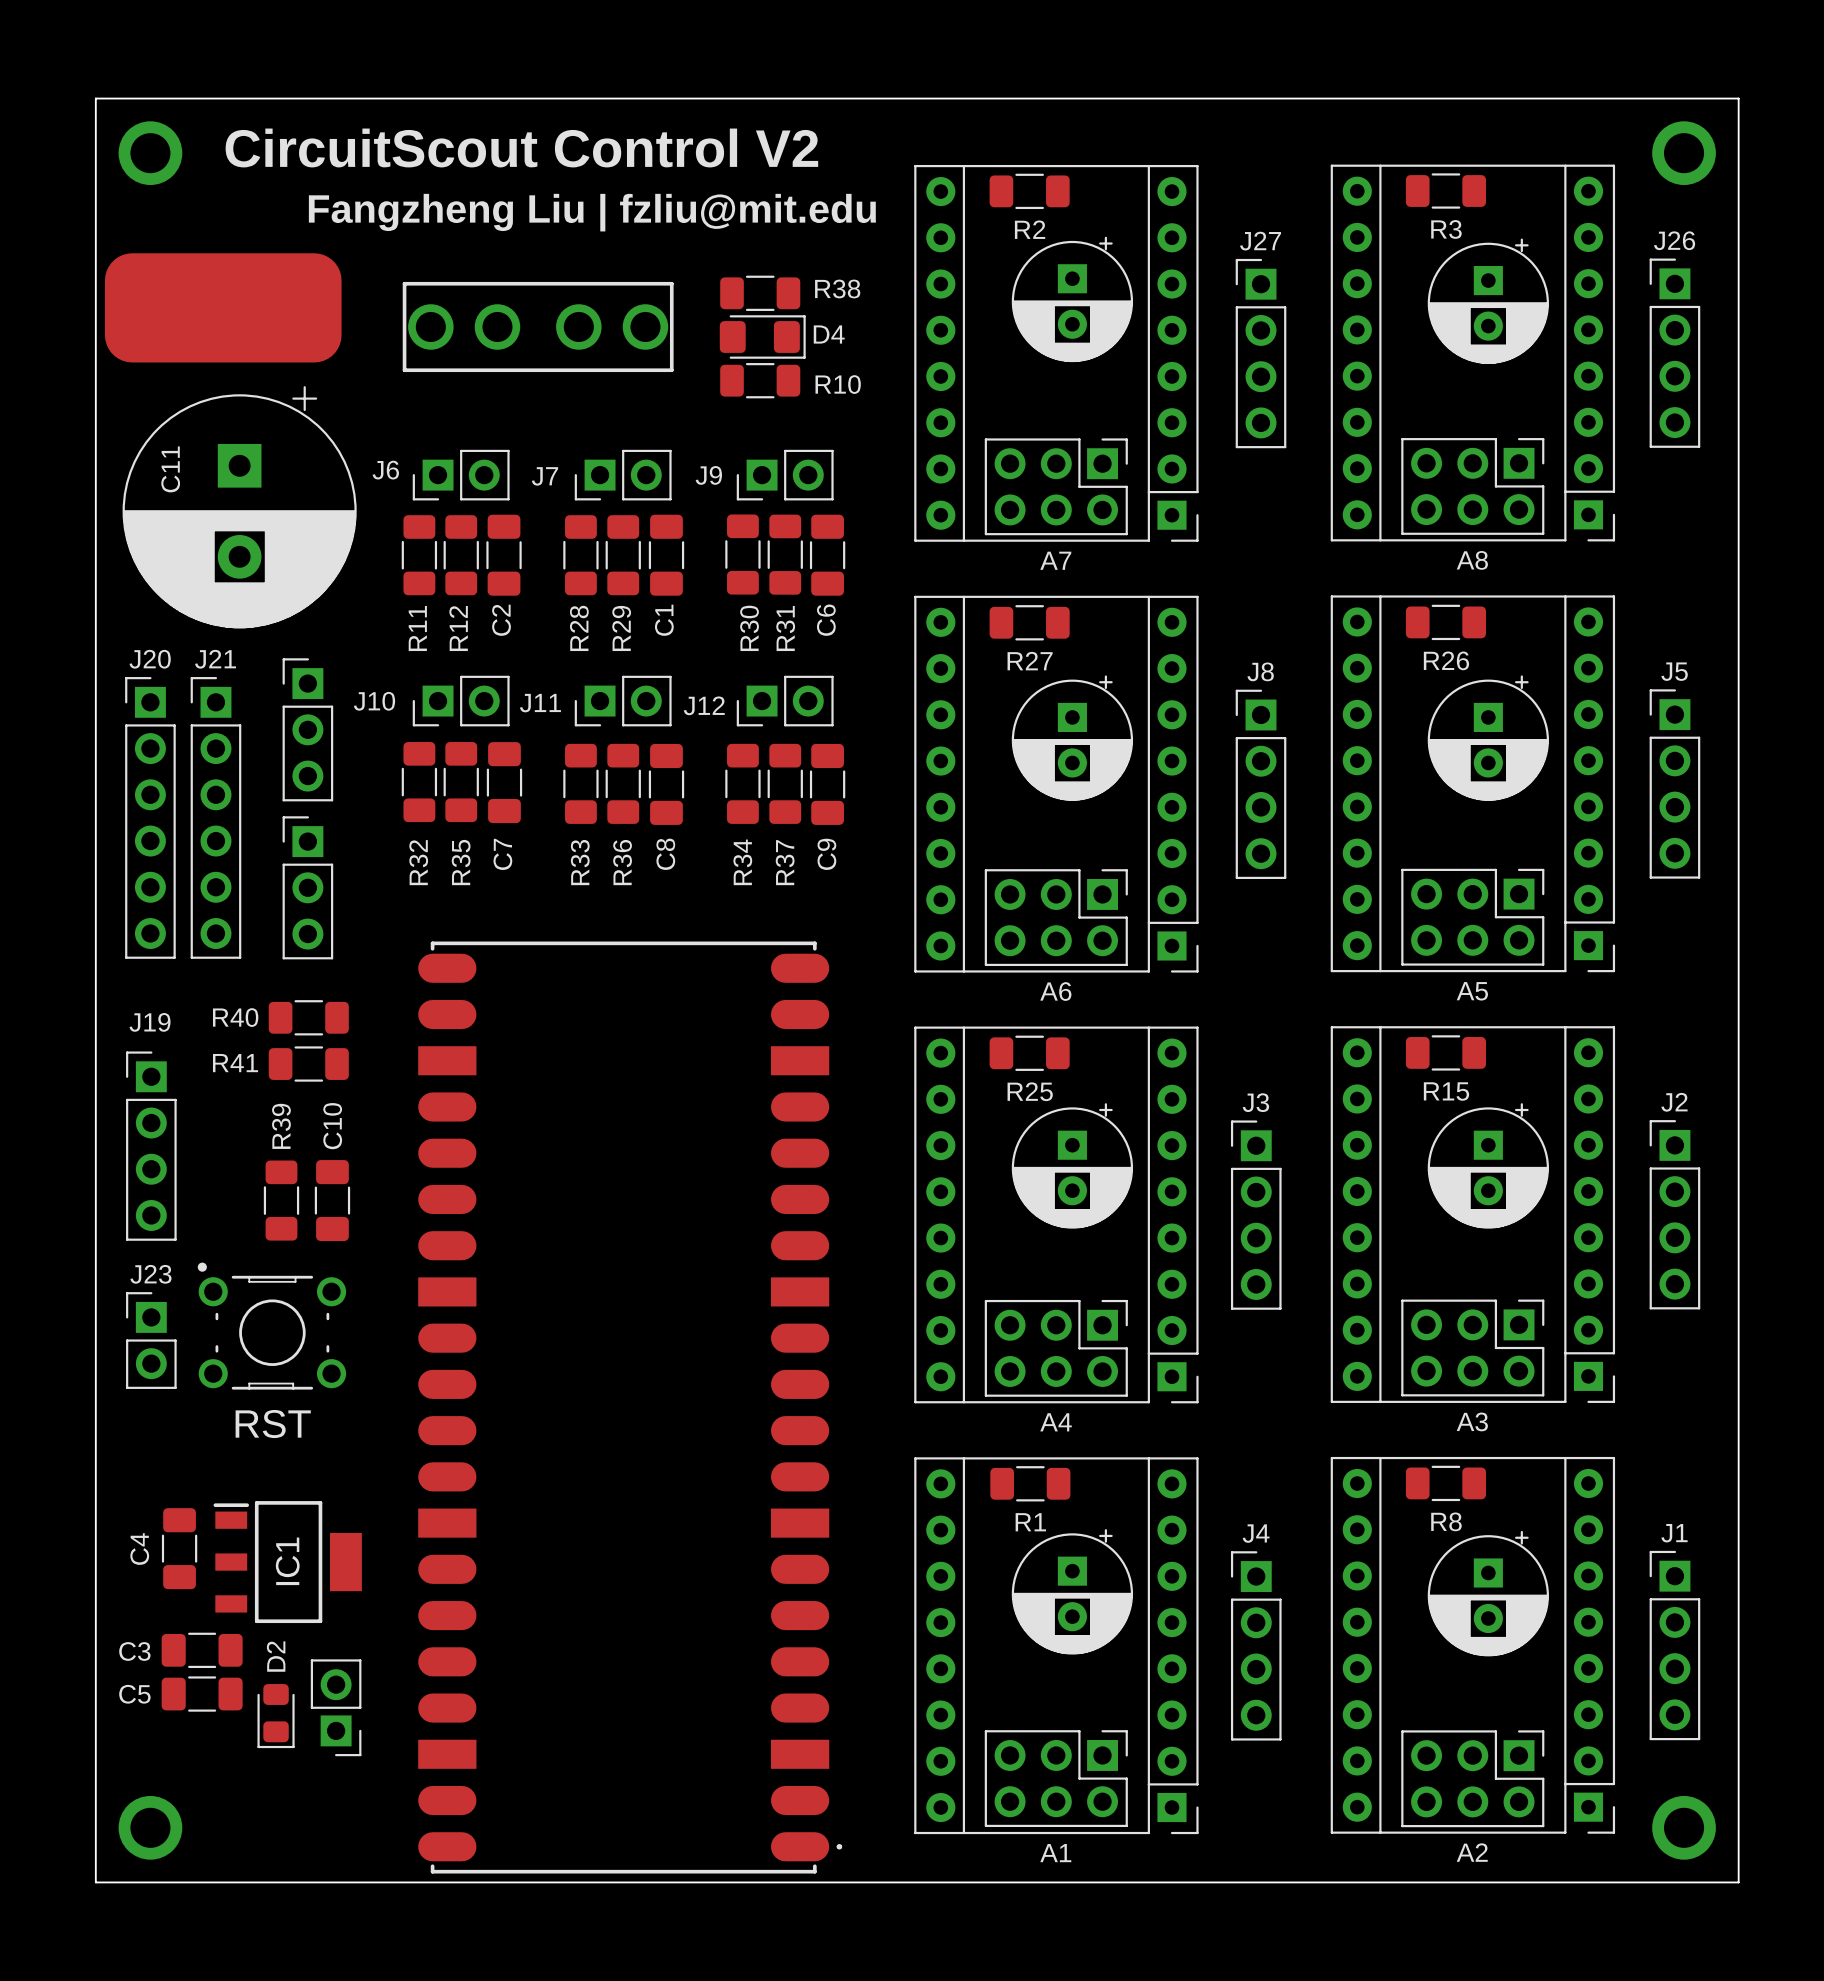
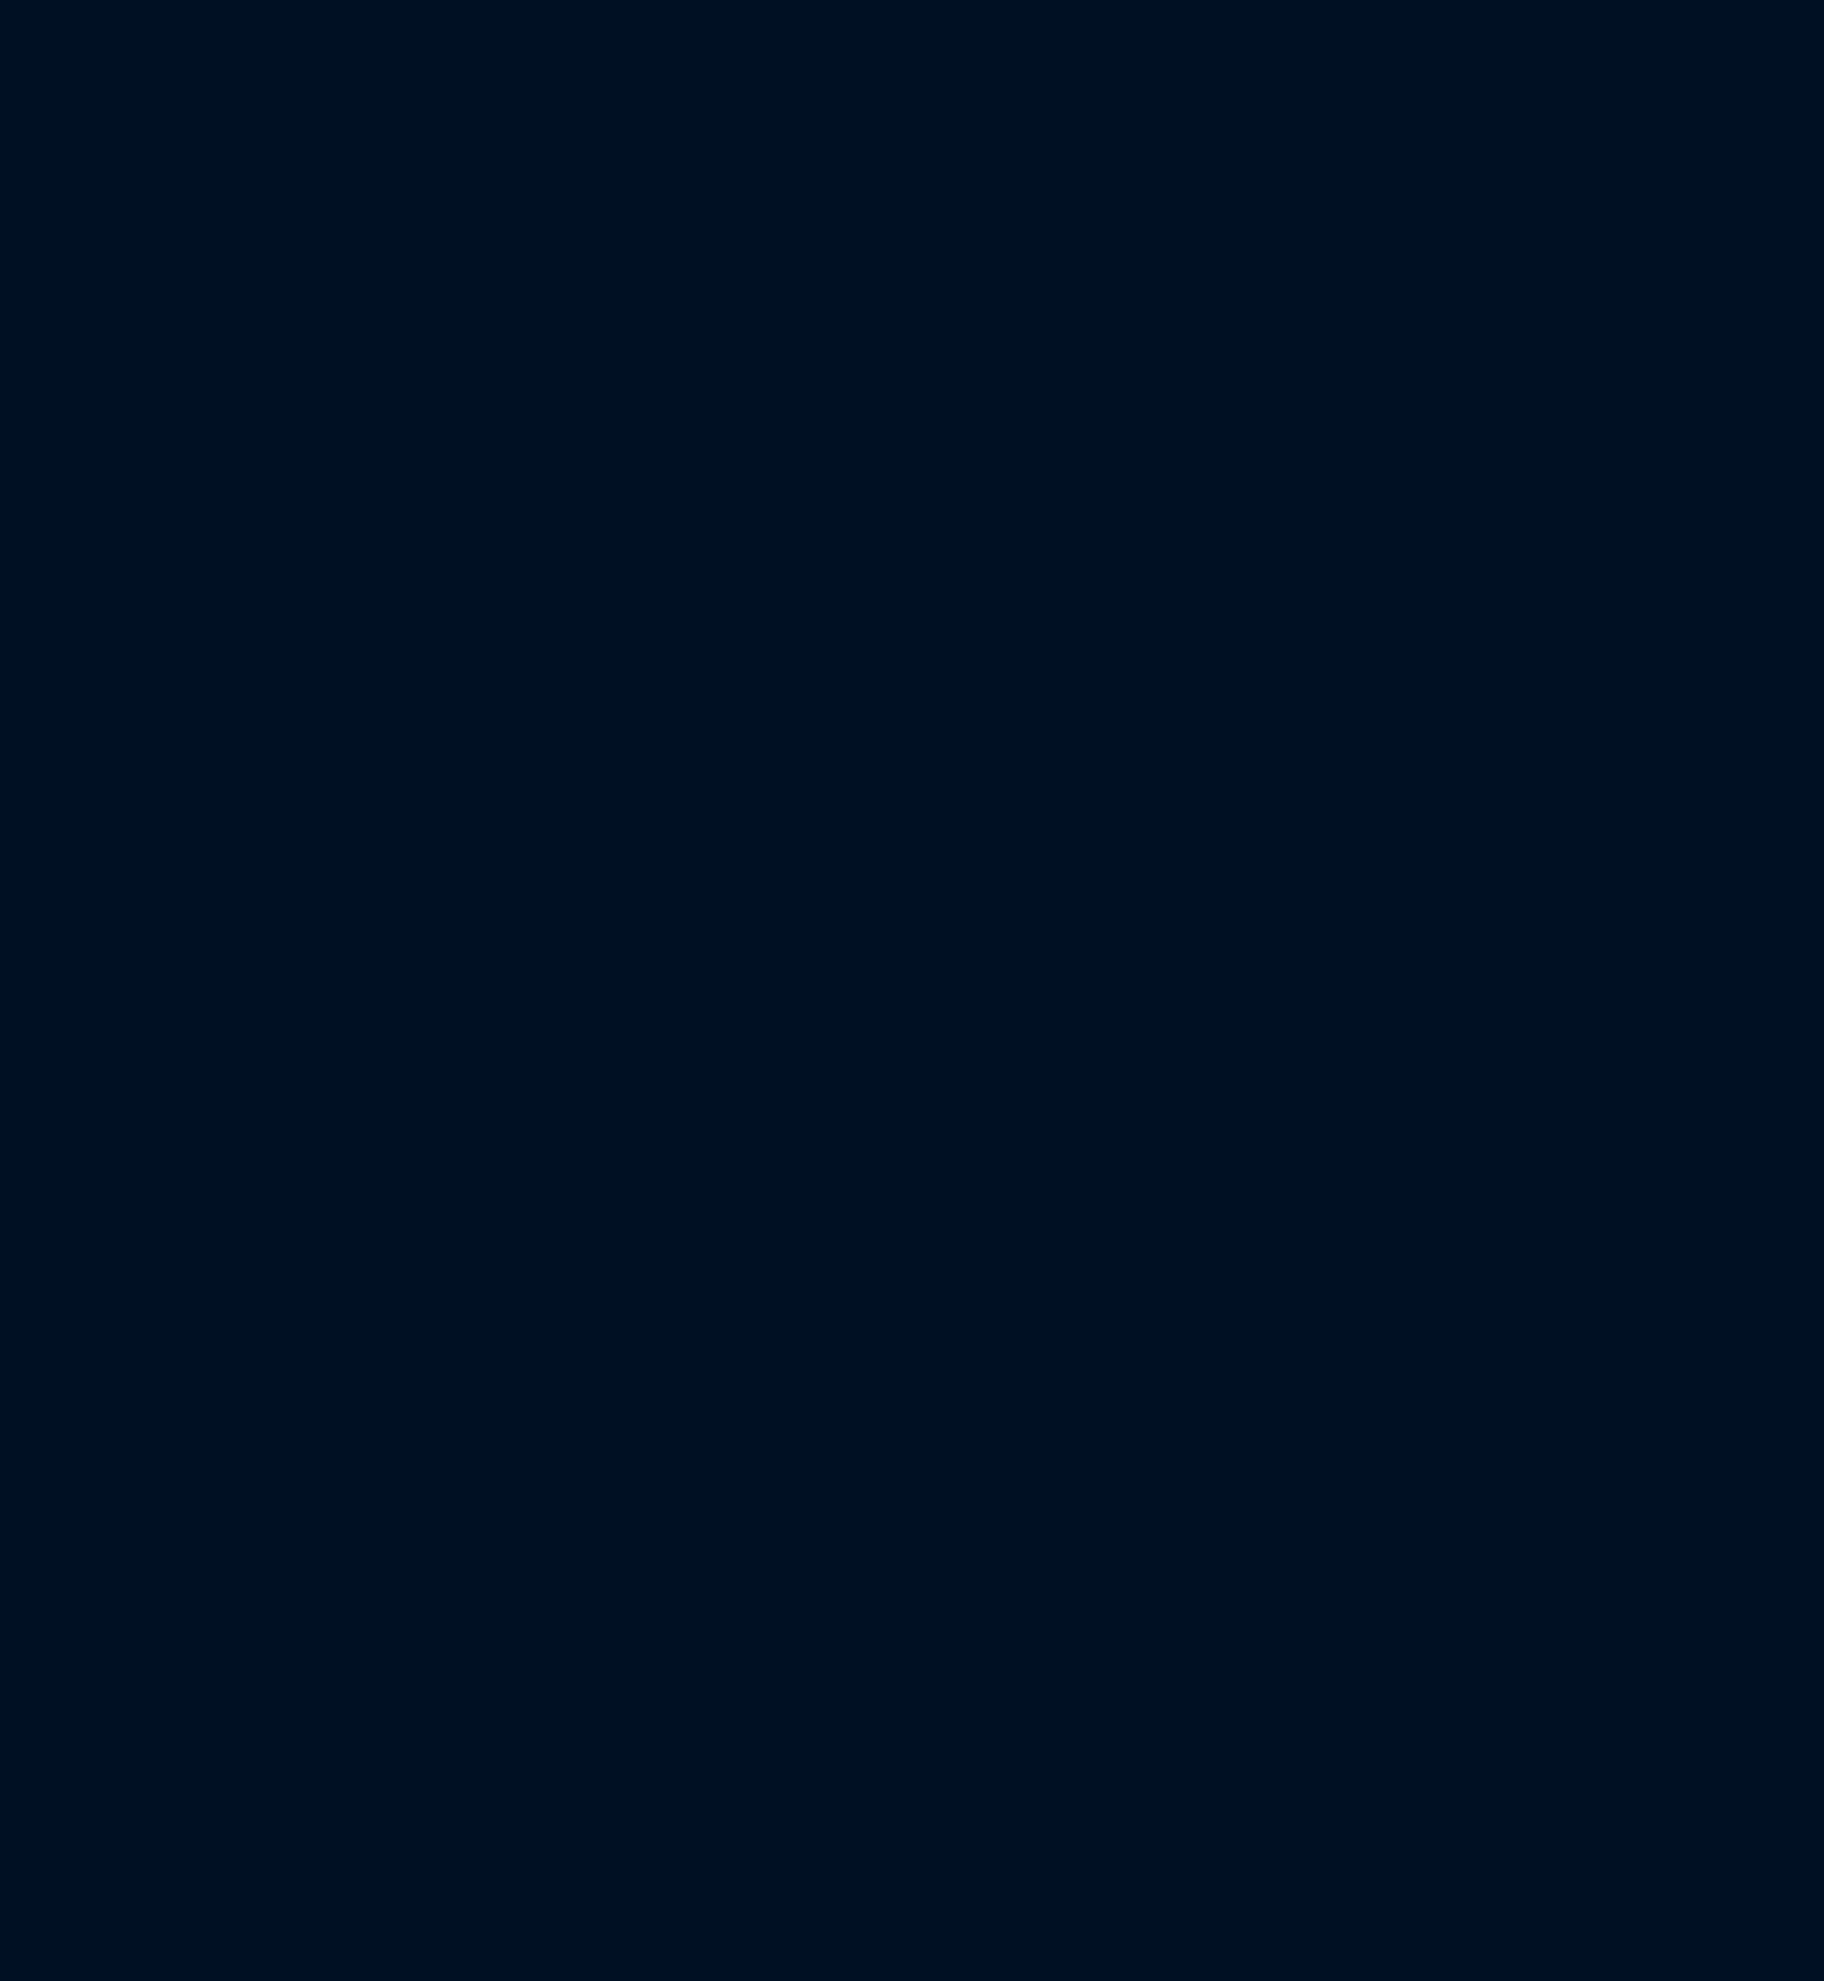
board edge: (95, 98) (1738, 98) (1738, 1882) (95, 1882) (95, 98) -> none
text: CircuitScout Control V2 (521, 147) -> none
part: (150, 153) -> none
part: (1684, 153) -> none
R2: (1029, 191) -> none
R3: (1445, 191) -> none
text: Fangzheng Liu | fzliu@mit.edu (592, 212) -> none
R38: (760, 293) -> none
part: (1072, 299) -> none
part: (1488, 301) -> none
part: (223, 307) -> none
part: (538, 326) -> none
D4: (762, 337) -> none
A7: (1056, 353) -> none
J27: (1261, 353) -> none
A8: (1472, 353) -> none
J26: (1674, 353) -> none
R10: (760, 380) -> none
J6: (461, 475) -> none
J7: (623, 475) -> none
J9: (785, 475) -> none
part: (1056, 486) -> none
part: (1472, 486) -> none
C11: (239, 507) -> none
R30: (742, 554) -> none
R31: (785, 554) -> none
R11: (419, 555) -> none
R12: (461, 555) -> none
C2: (504, 555) -> none
R28: (580, 555) -> none
R29: (623, 555) -> none
C1: (666, 555) -> none
C6: (827, 555) -> none
R27: (1029, 622) -> none
R26: (1445, 622) -> none
J10: (461, 701) -> none
J11: (623, 701) -> none
J12: (785, 701) -> none
part: (307, 729) -> none
part: (1072, 738) -> none
part: (1488, 738) -> none
R32: (419, 782) -> none
R35: (461, 782) -> none
C7: (504, 782) -> none
R33: (580, 783) -> none
R36: (623, 783) -> none
R34: (742, 783) -> none
R37: (785, 783) -> none
A5: (1472, 783) -> none
J5: (1674, 783) -> none
C8: (666, 784) -> none
C9: (827, 784) -> none
A6: (1056, 784) -> none
J8: (1261, 784) -> none
J20: (150, 817) -> none
J21: (215, 817) -> none
part: (307, 887) -> none
part: (1056, 917) -> none
part: (1472, 917) -> none
R40: (308, 1017) -> none
R15: (1445, 1052) -> none
R25: (1029, 1053) -> none
R41: (308, 1064) -> none
J19: (151, 1146) -> none
part: (1072, 1165) -> none
part: (1488, 1165) -> none
R39: (281, 1200) -> none
C10: (332, 1200) -> none
A4: (1056, 1214) -> none
A3: (1472, 1214) -> none
J2: (1674, 1214) -> none
J3: (1256, 1215) -> none
part: (271, 1326) -> none
J23: (151, 1340) -> none
part: (1472, 1347) -> none
part: (1056, 1348) -> none
part: (630, 1407) -> none
text: RST (273, 1424) -> none
R1: (1030, 1483) -> none
R8: (1445, 1483) -> none
C4: (179, 1548) -> none
IC1: (287, 1562) -> none
part: (1072, 1591) -> none
part: (1488, 1593) -> none
A1: (1056, 1645) -> none
J4: (1256, 1645) -> none
A2: (1472, 1645) -> none
J1: (1674, 1645) -> none
C3: (202, 1650) -> none
C5: (202, 1694) -> none
part: (336, 1707) -> none
D2: (276, 1716) -> none
part: (1056, 1778) -> none
part: (1472, 1778) -> none
part: (150, 1827) -> none
part: (1684, 1827) -> none

